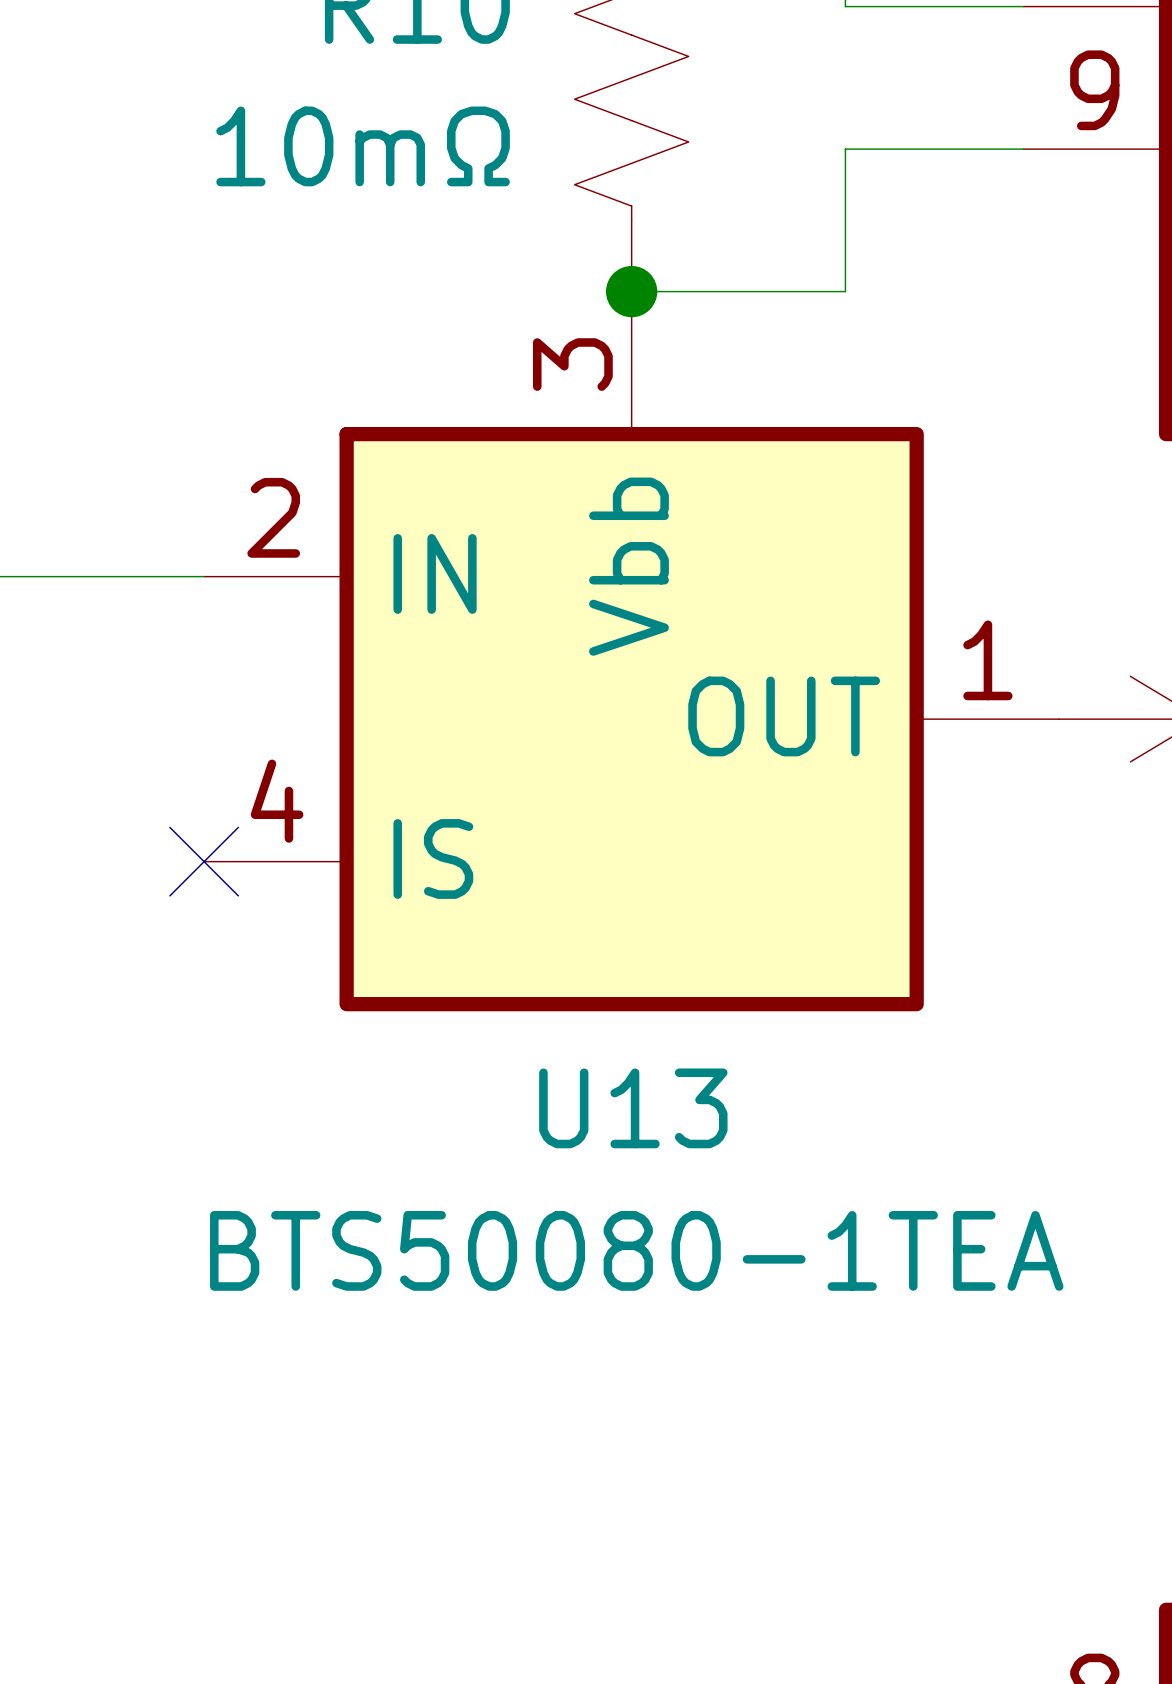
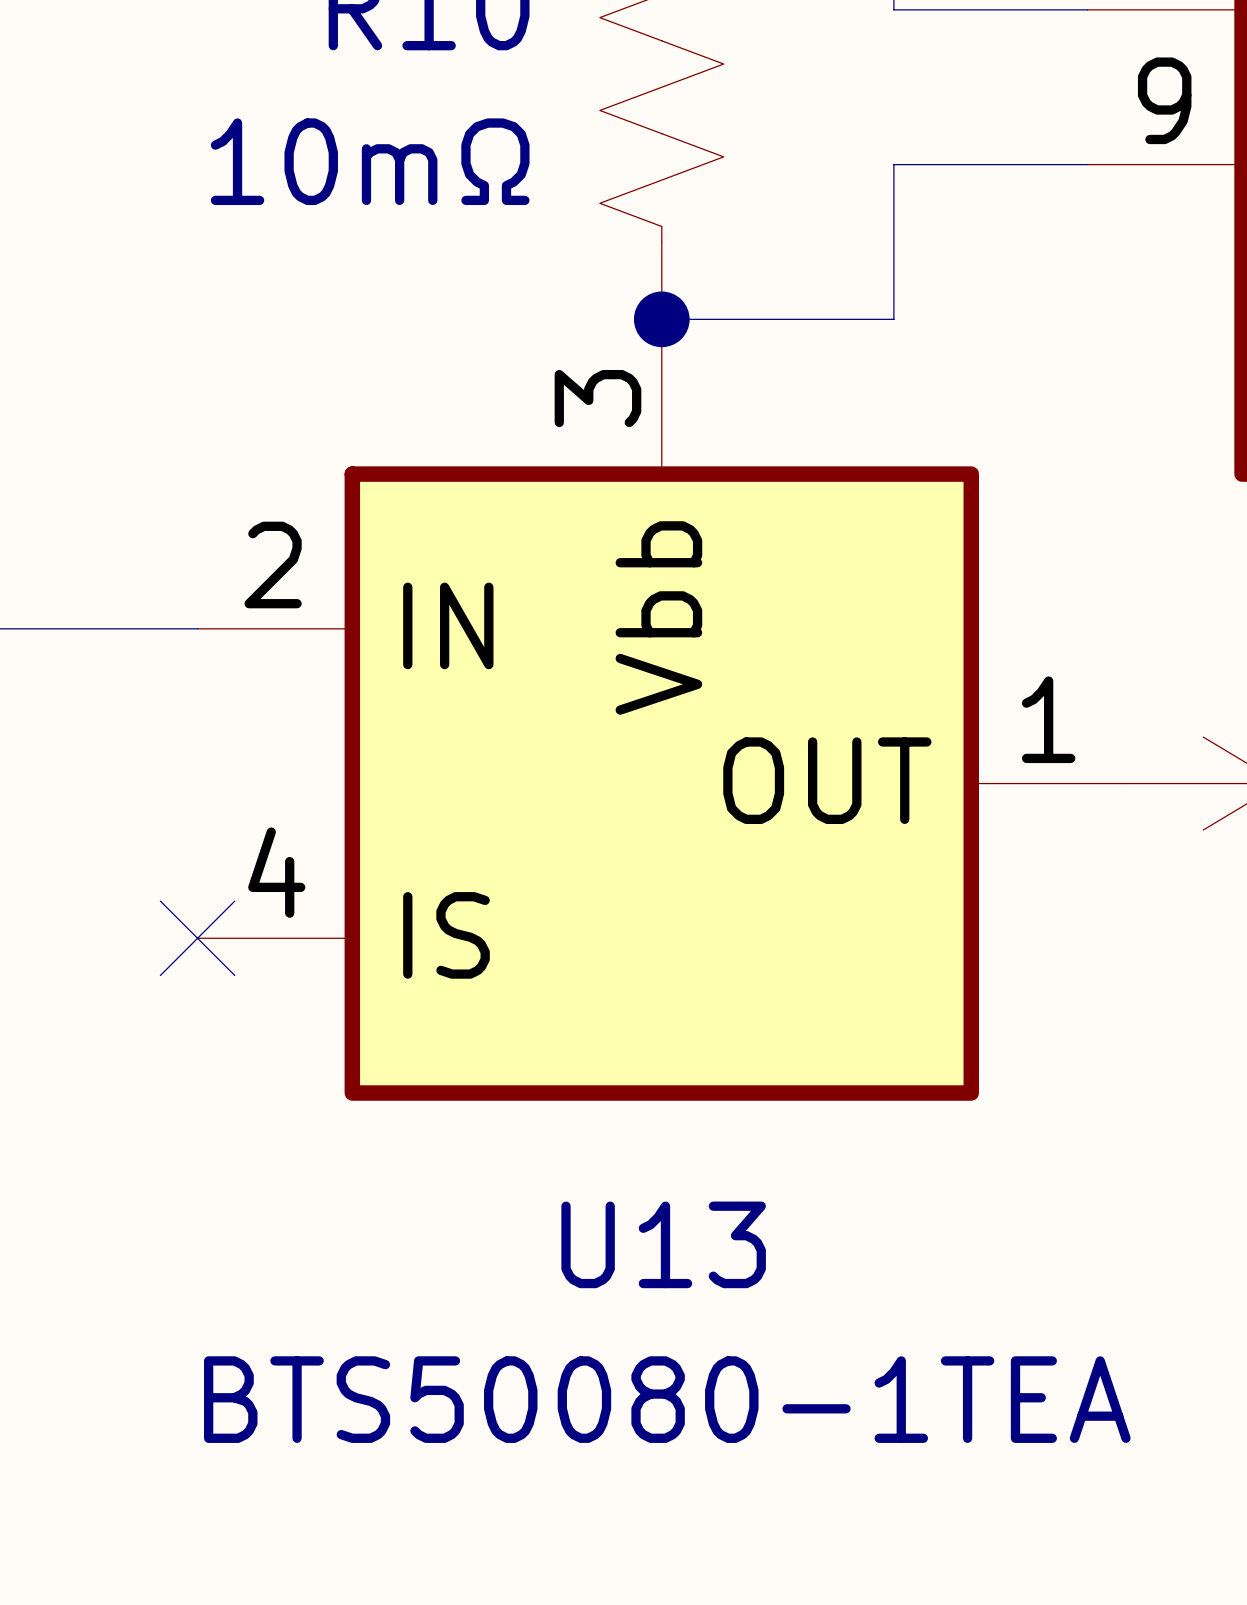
U13 name position: U13 (633, 1108) -> U13 (663, 1244)
U13 value position: BTS50080-1TEA (636, 1250) -> BTS50080-1TEA (667, 1399)

